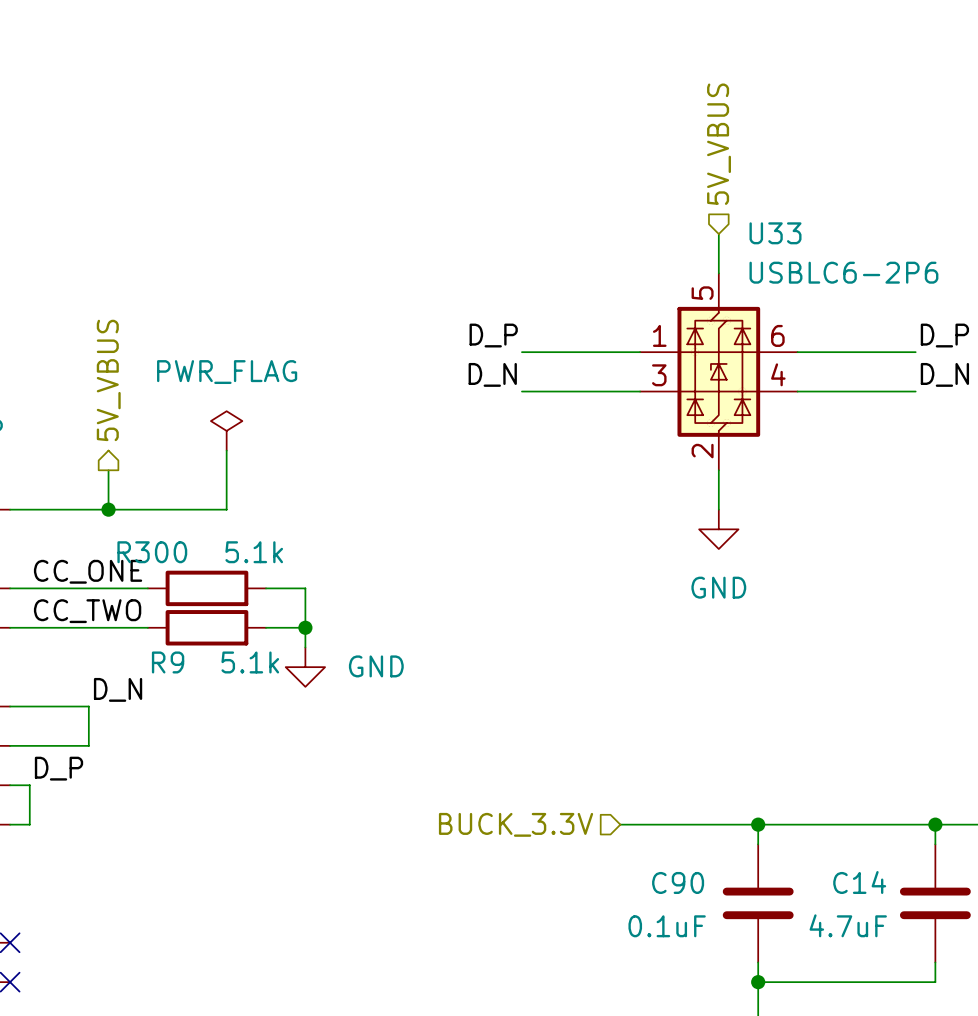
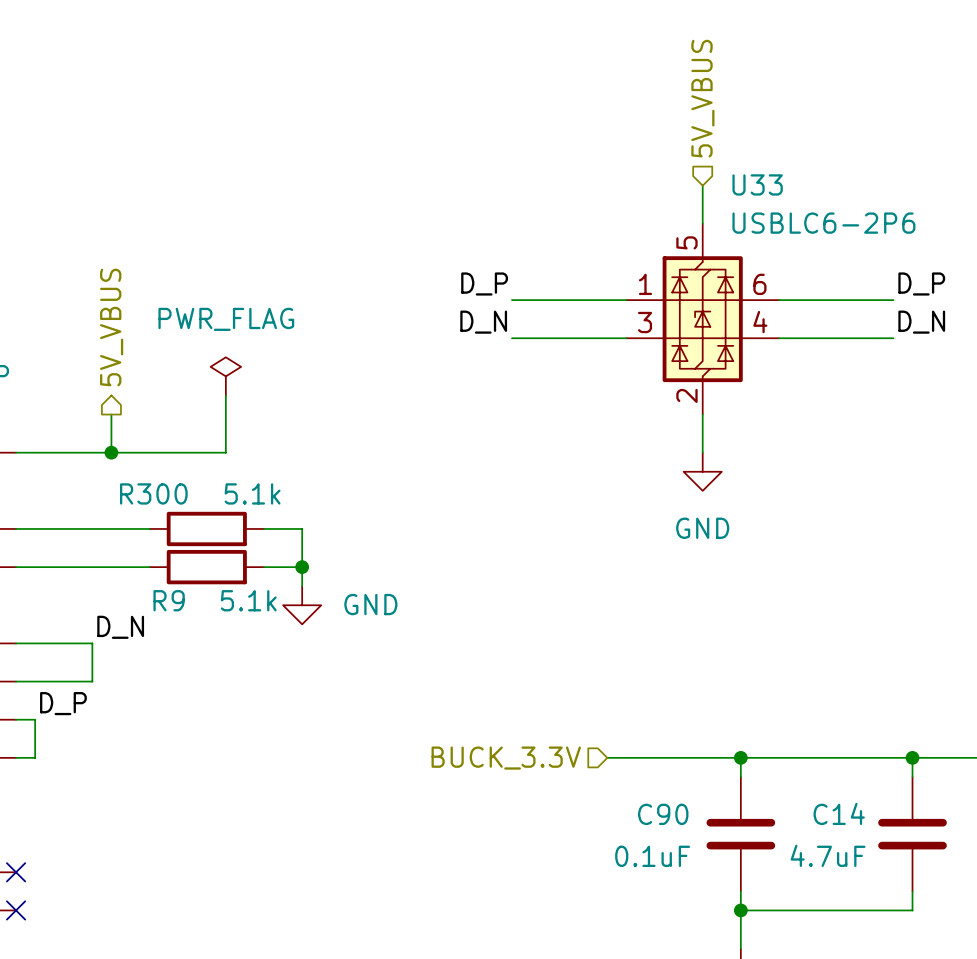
label: CC_ONE (88, 571) -> none
label: CC_TWO (87, 611) -> none

